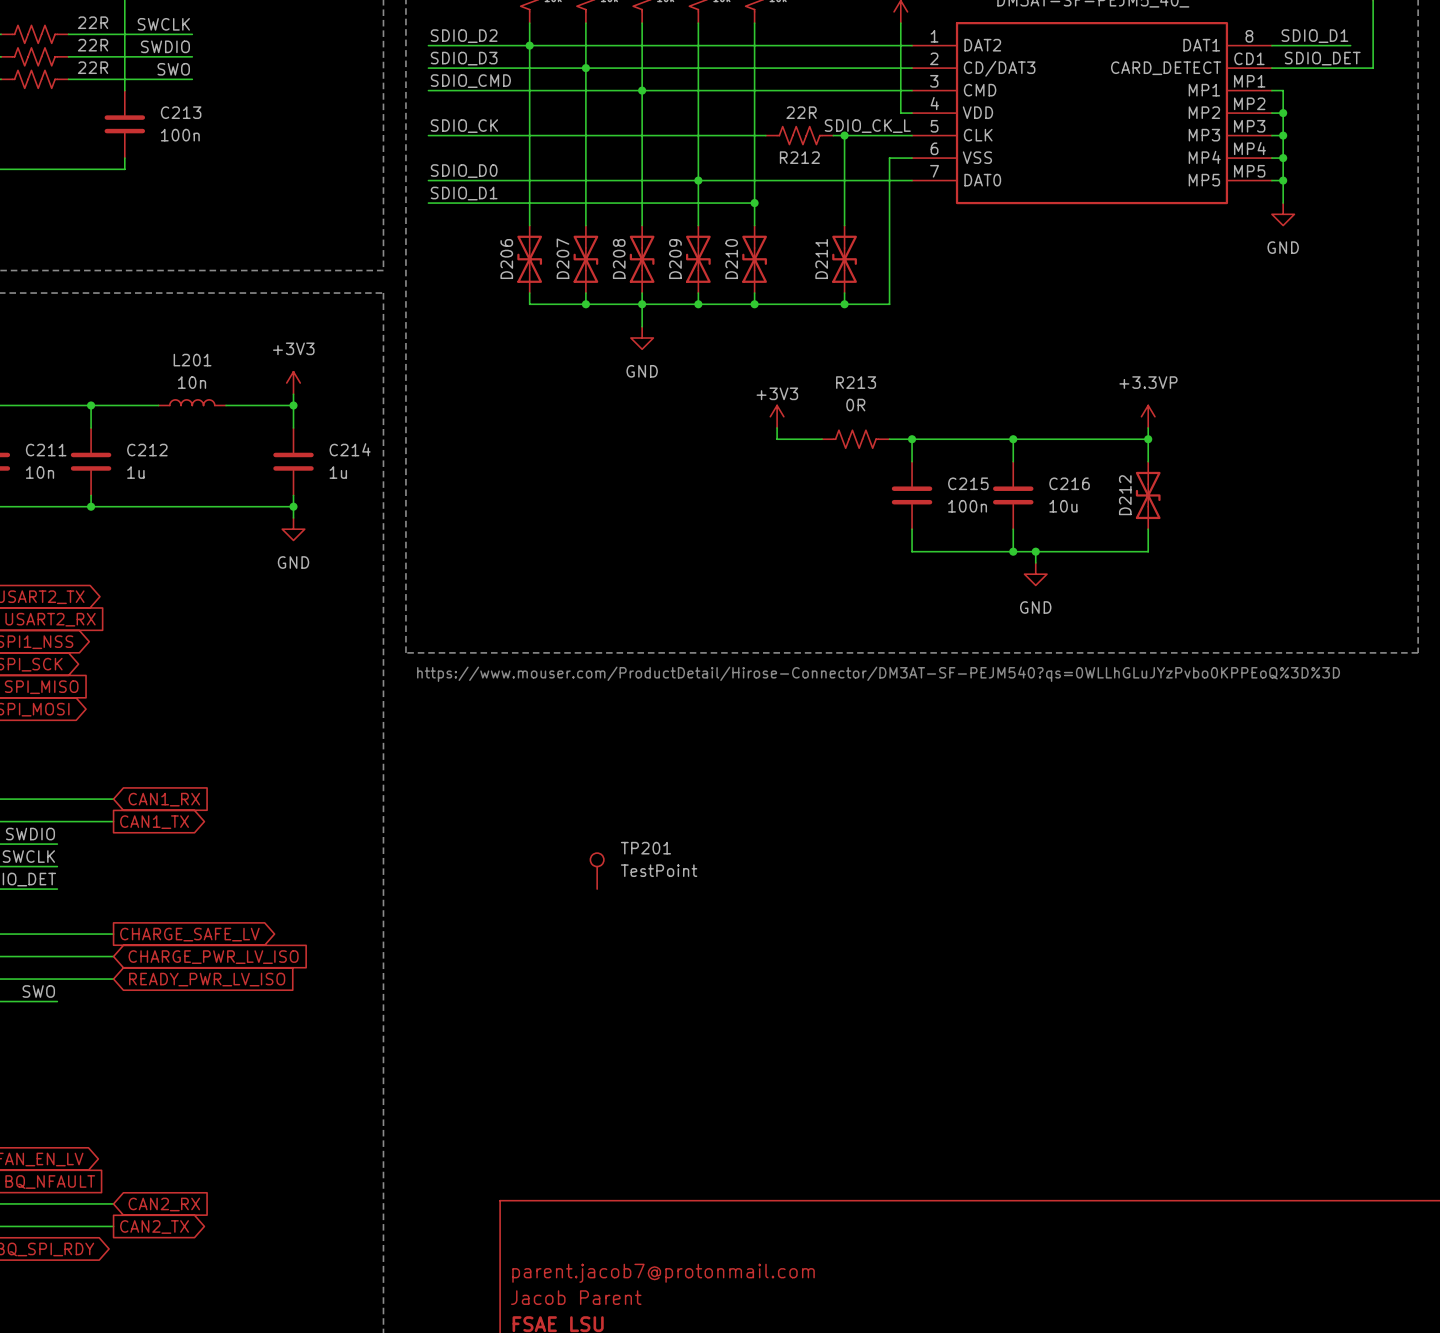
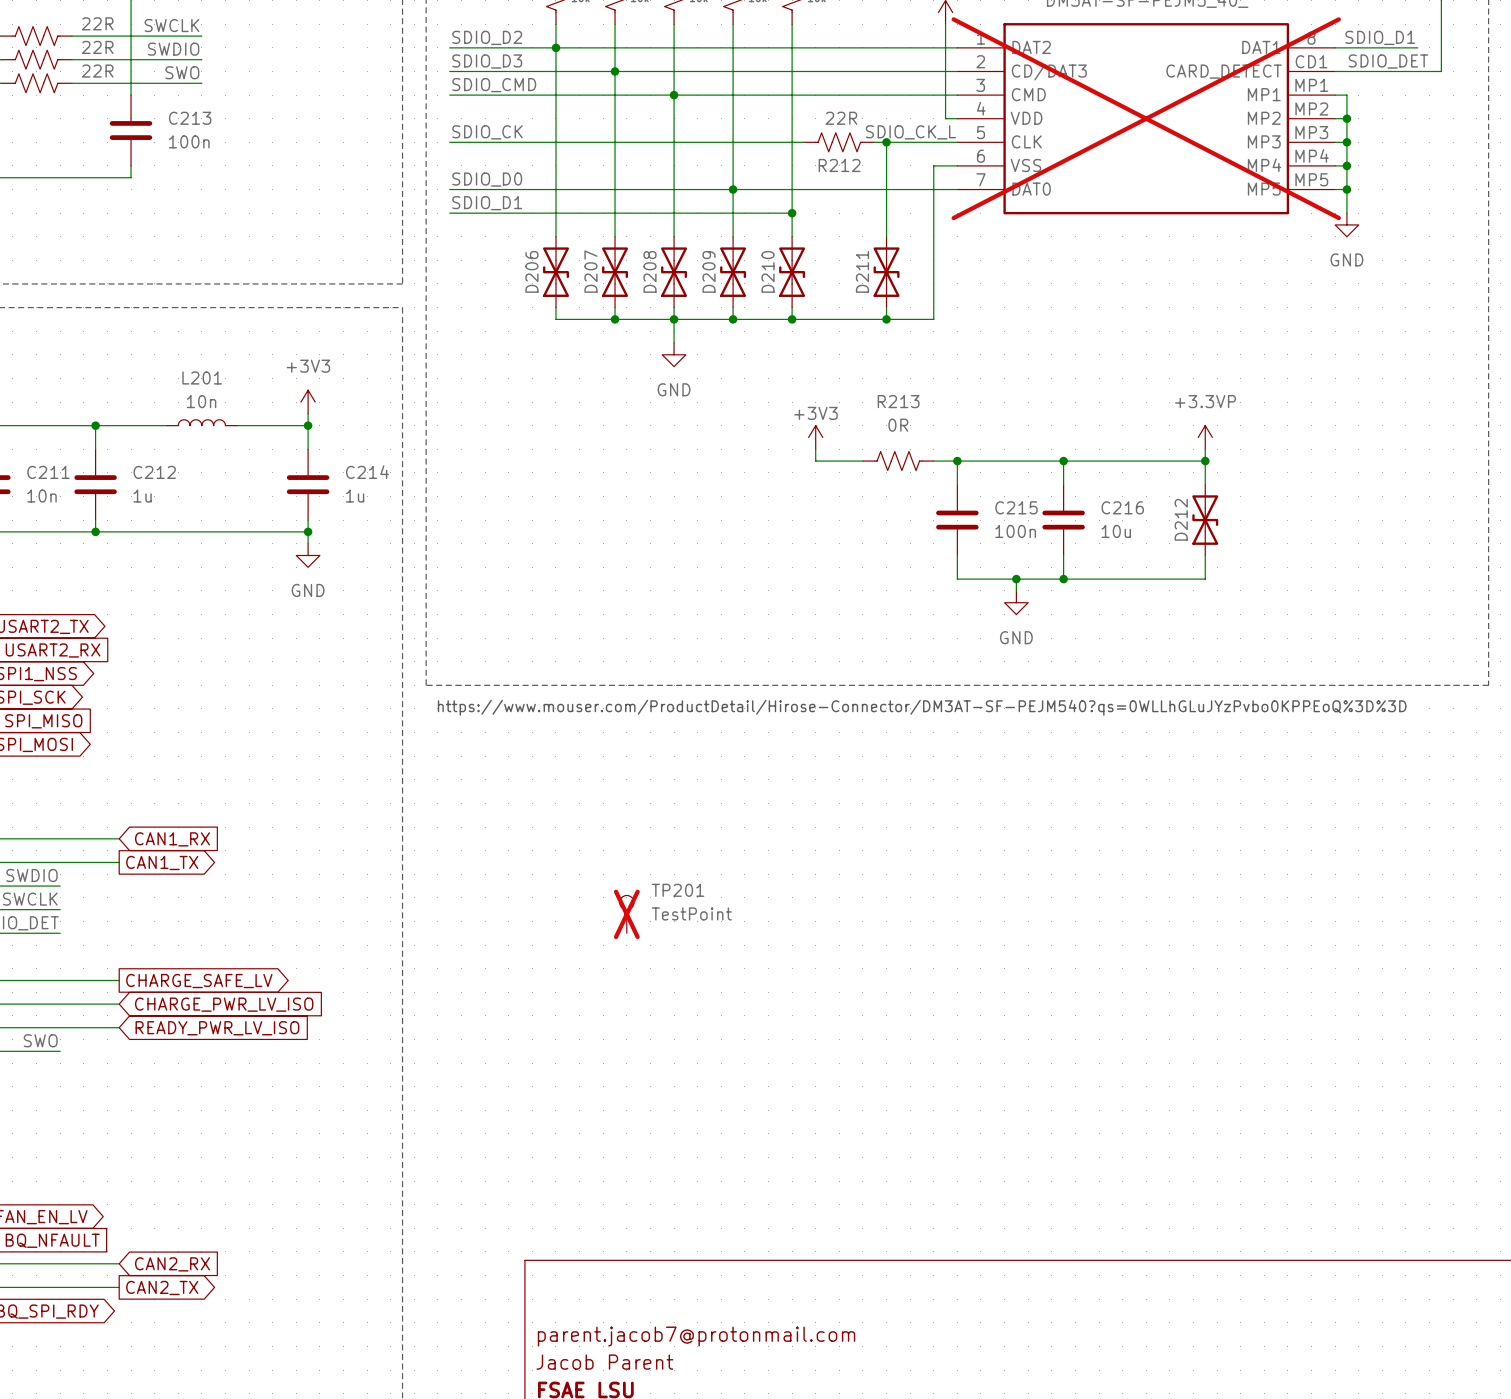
part do-not-place cross: none -> (1146, 118)
junction: none -> (1016, 579)
wire: (1035, 551) (1035, 562) -> (1016, 579) (1016, 590)
junction: (1035, 551) -> none
power symbol position: GND (1035, 574) -> GND (1016, 602)
TP201 do-not-place cross: none -> (626, 914)

